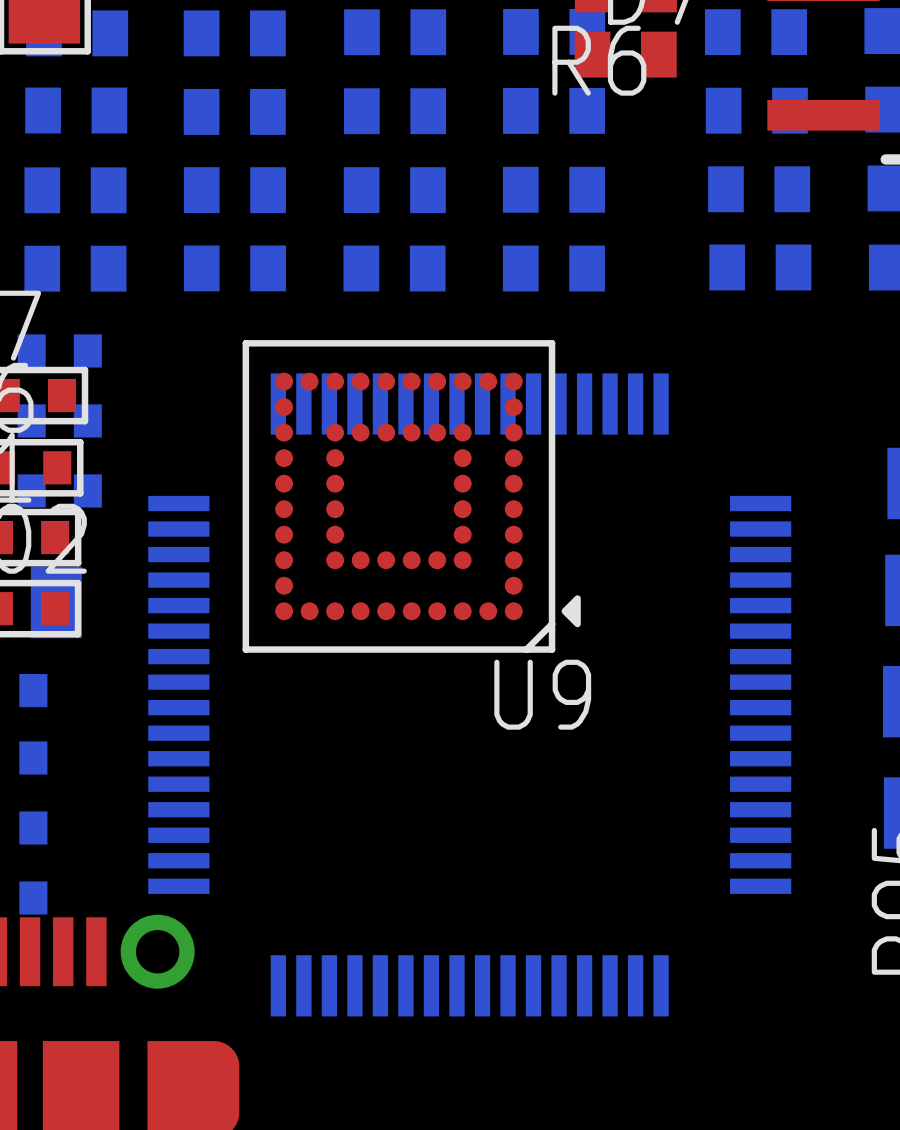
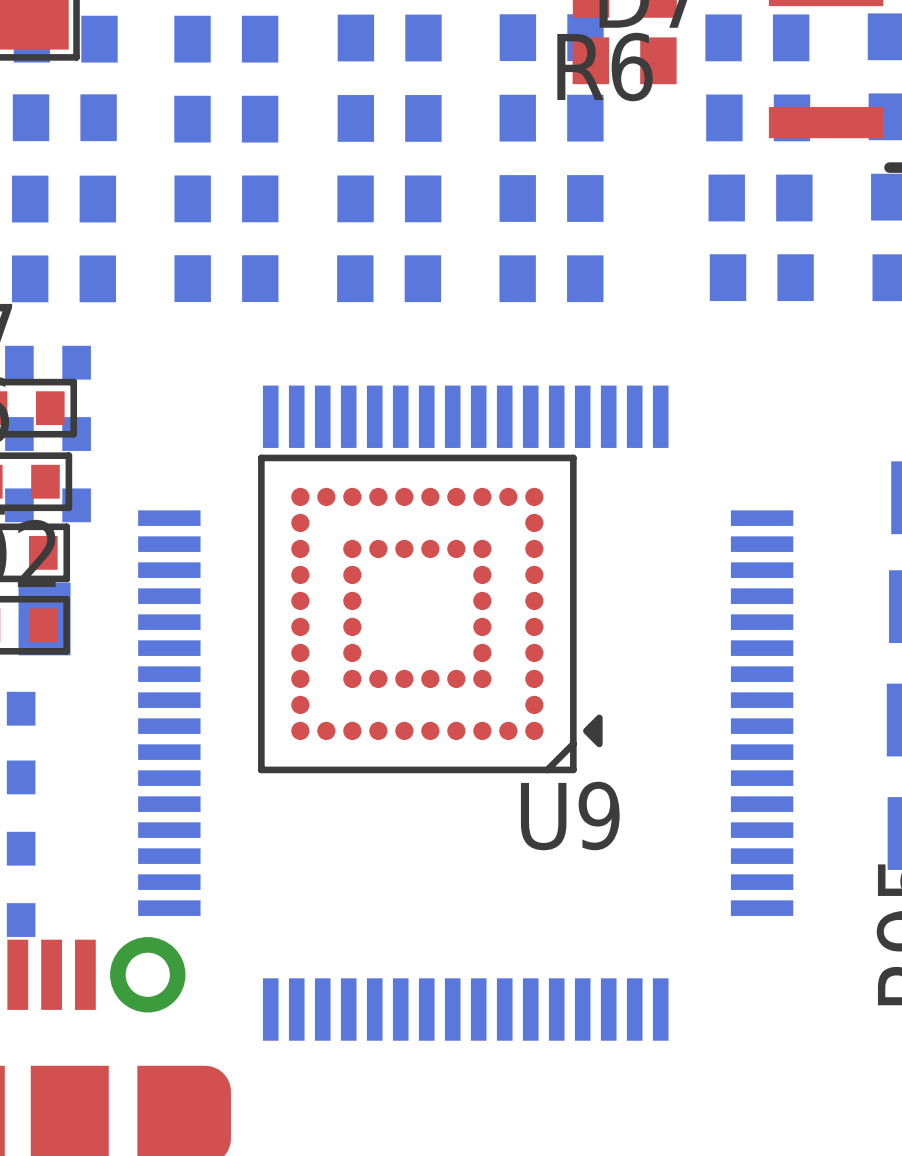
U9 position: (411, 496) -> (430, 613)

